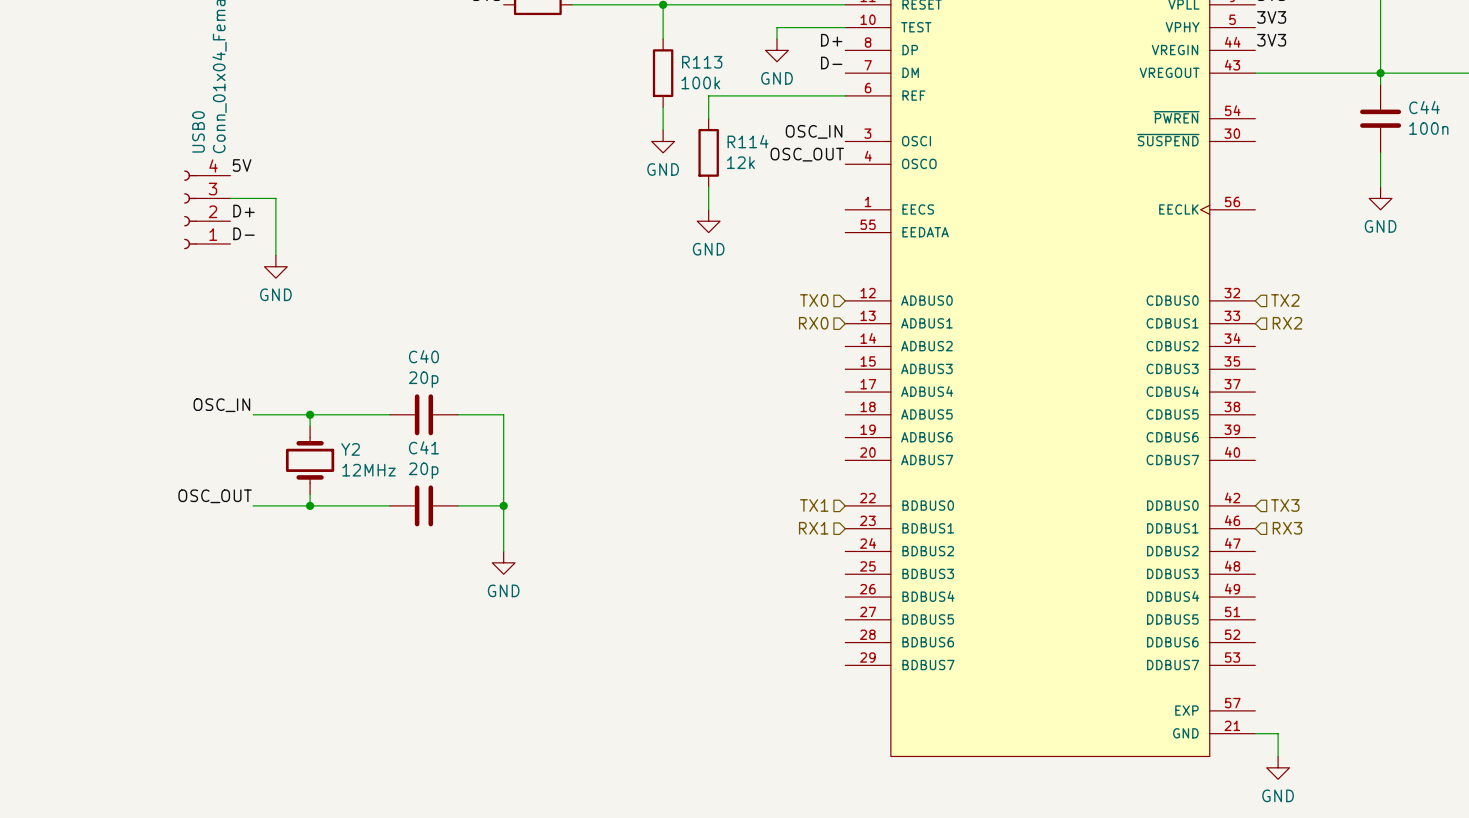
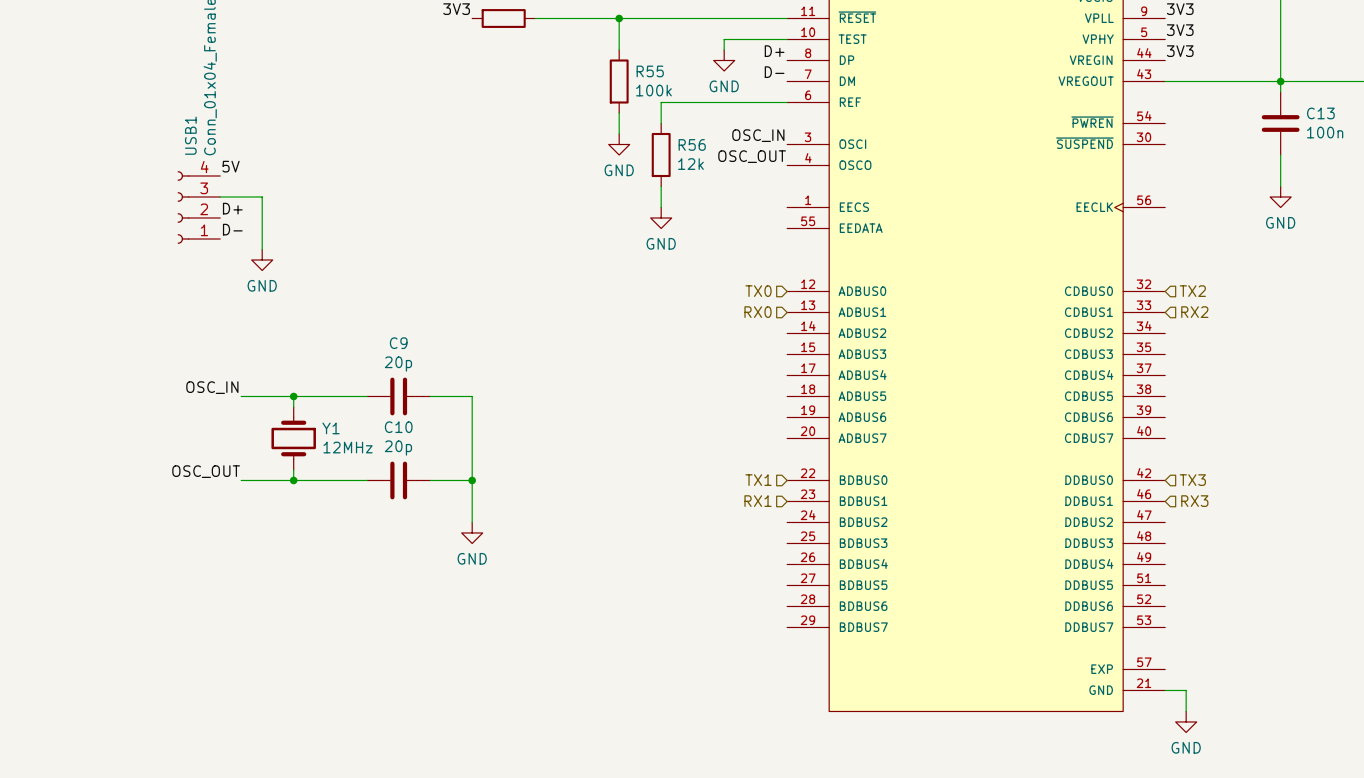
R113 name: R113 (702, 62) -> R55 (650, 71)
C44 name: C44 (1424, 107) -> C13 (1320, 113)
USB0 name: USB0 (198, 131) -> USB1 (190, 135)
R114 name: R114 (748, 141) -> R56 (692, 144)
C40 name: C40 (423, 356) -> C9 (398, 343)
C41 name: C41 (423, 447) -> C10 (398, 427)
Y2 name: Y2 (350, 449) -> Y1 (331, 428)

